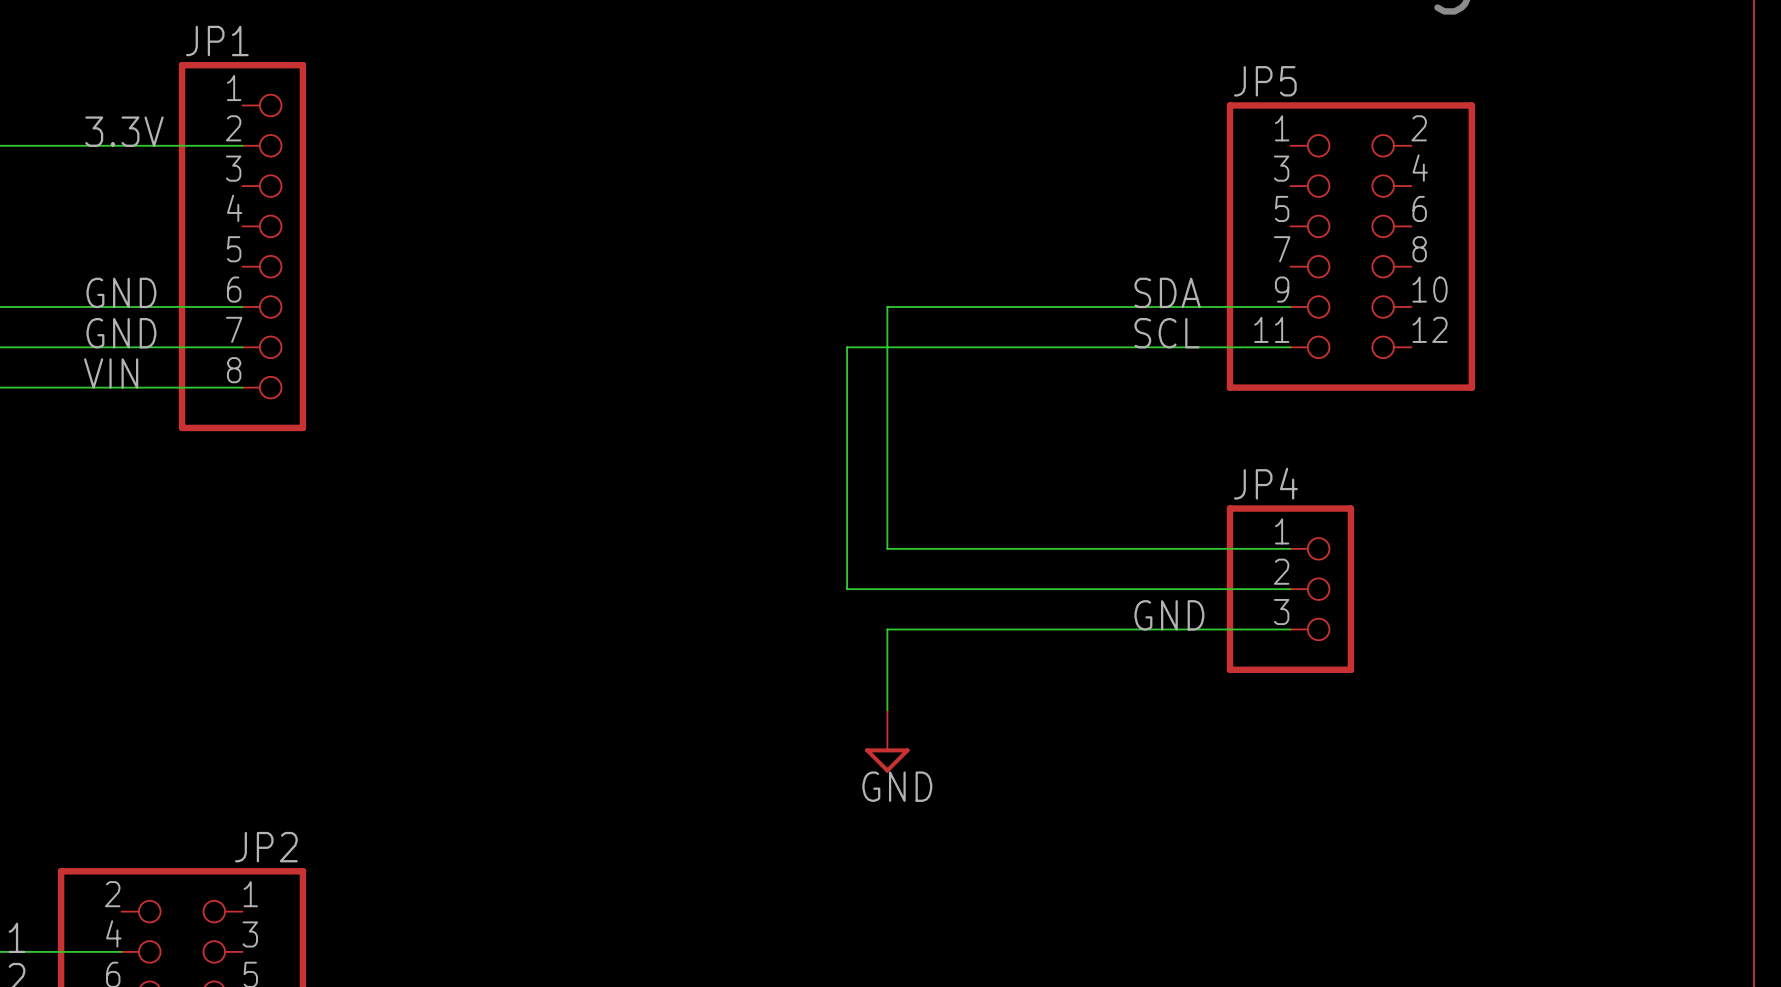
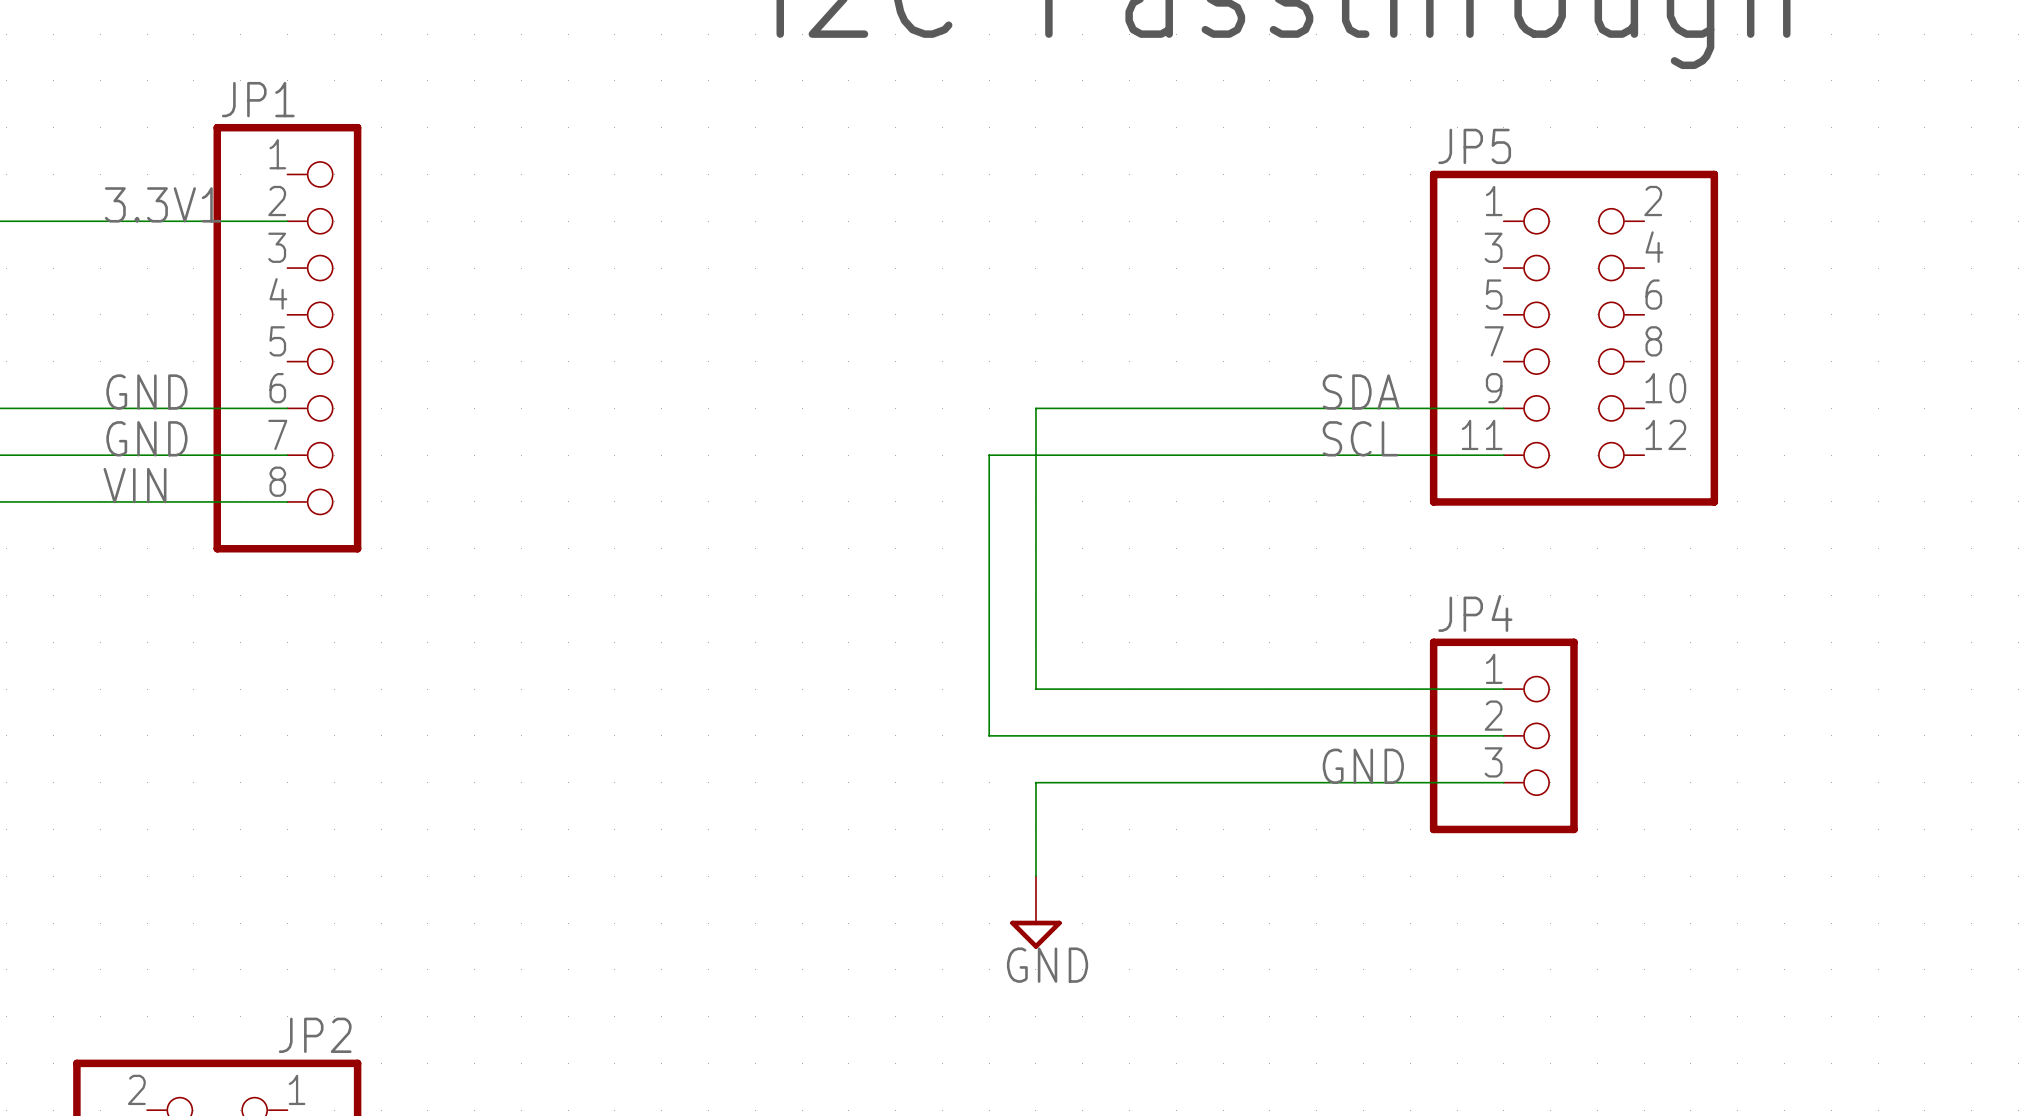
label: 3.3V (124, 131) -> 3.3V1 (163, 204)

